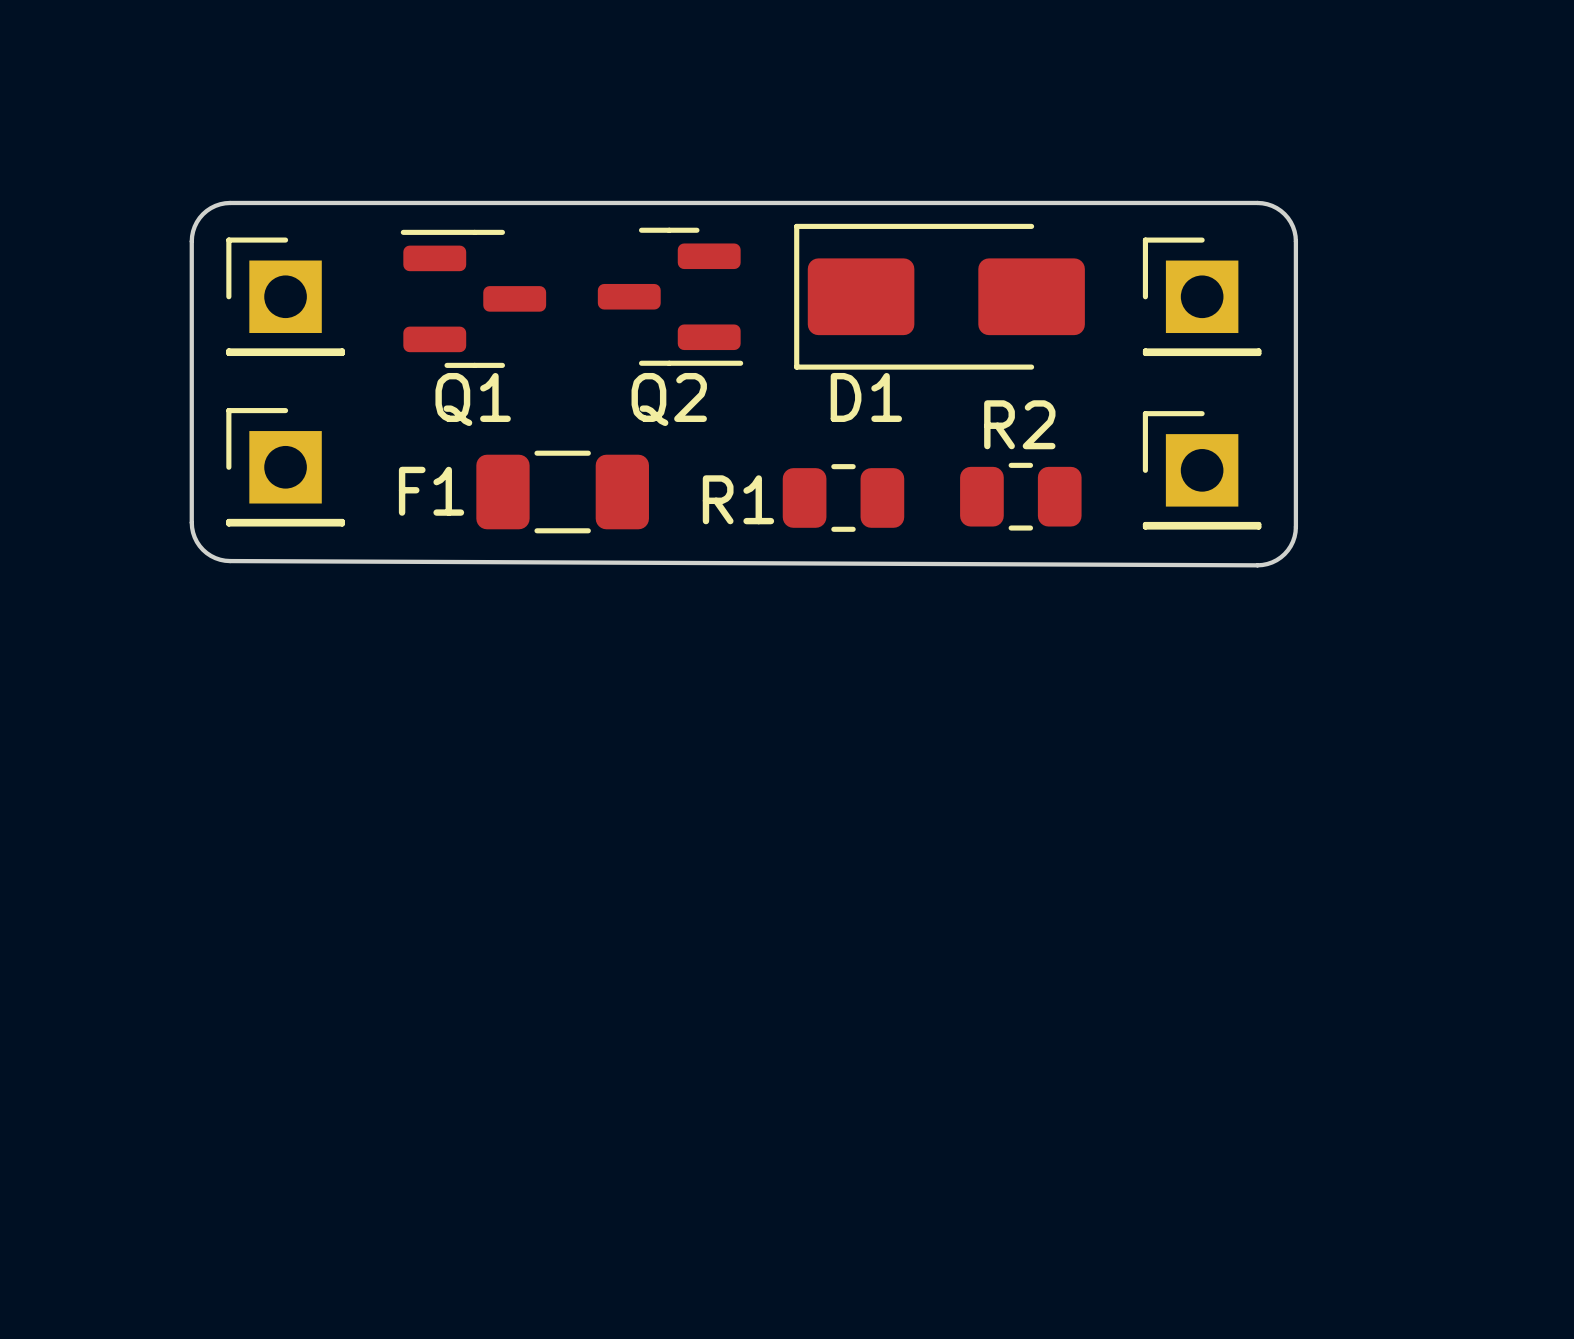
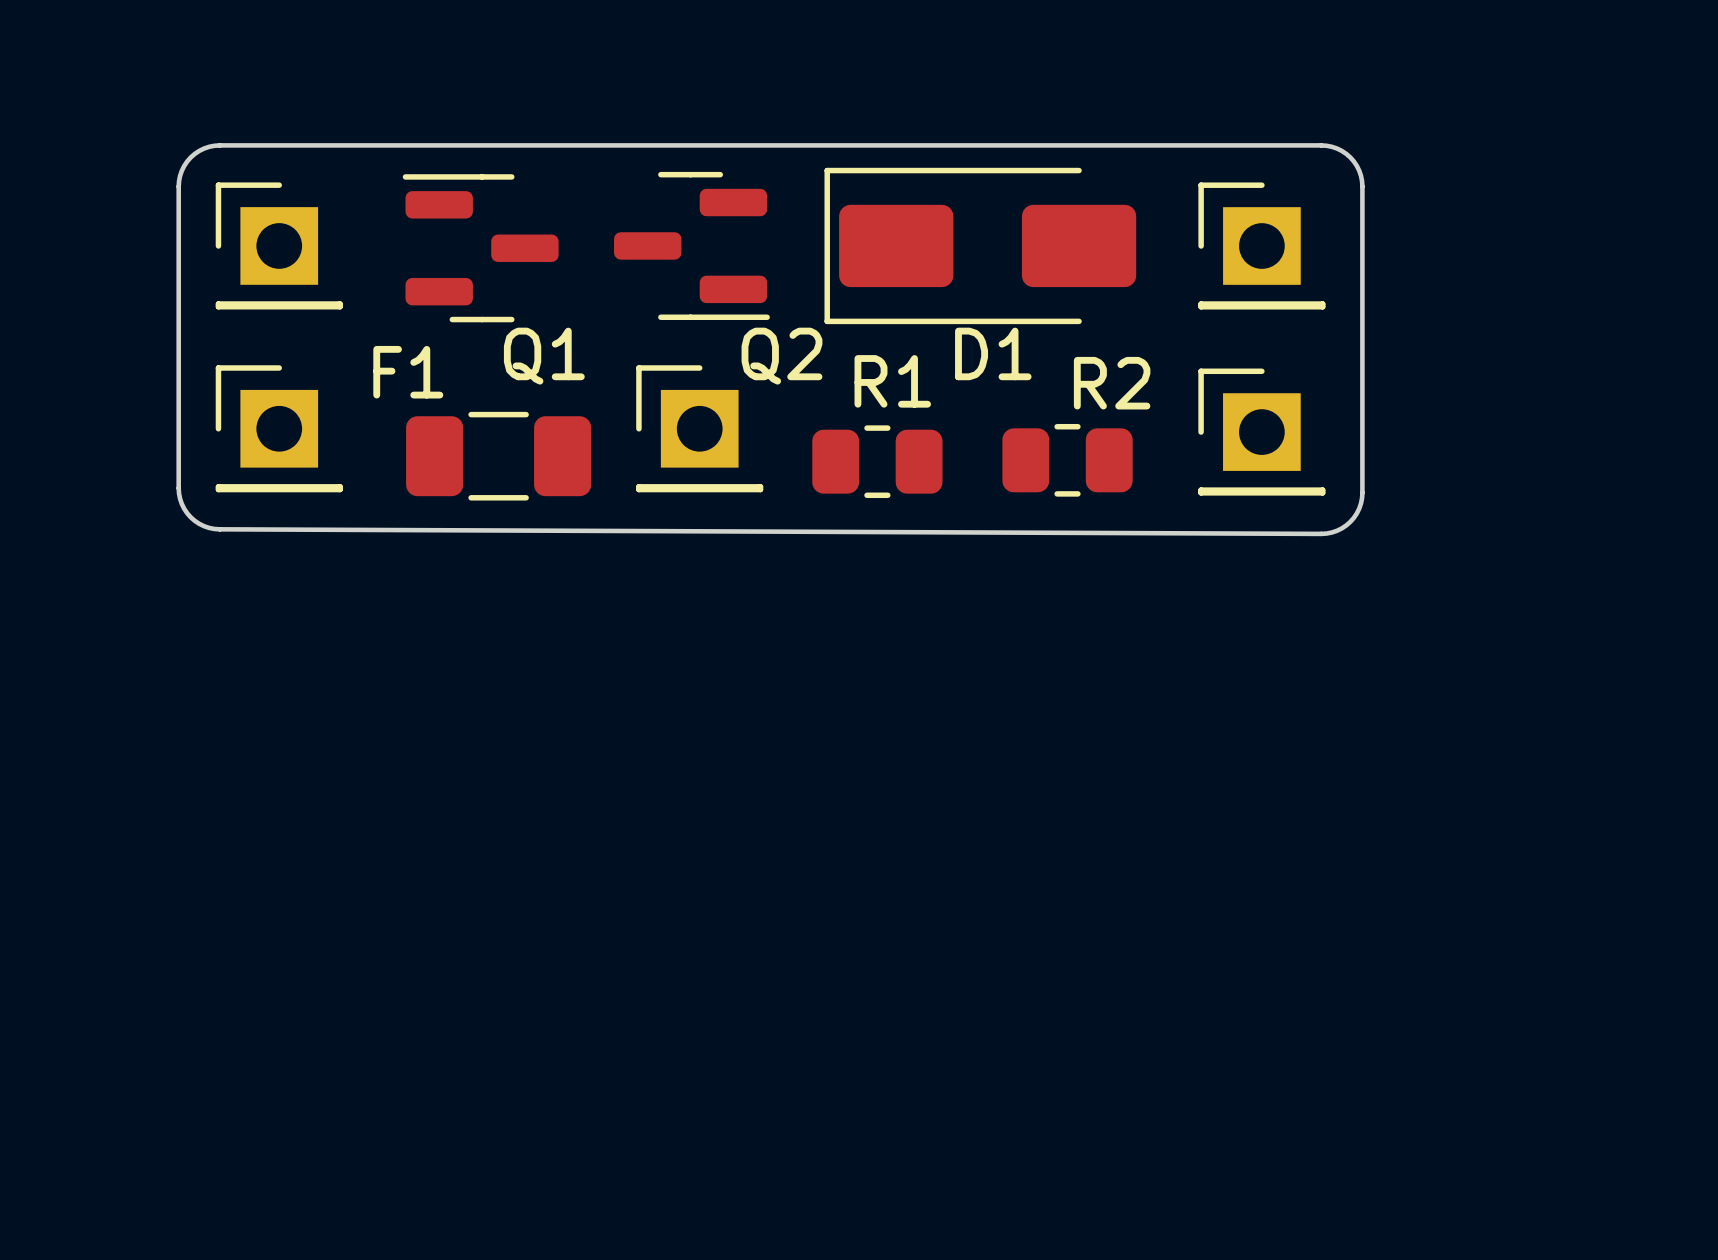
D1 name position: D1 (866, 397) -> D1 (993, 353)
Q1 name position: Q1 (473, 399) -> Q1 (544, 356)
Q2 name position: Q2 (669, 399) -> Q2 (781, 356)
R2 name position: R2 (1019, 424) -> R2 (1112, 383)
part: none -> (699, 428)
F1 name position: F1 (431, 491) -> F1 (408, 372)
F1 position: (562, 492) -> (498, 456)
R1 name position: R1 (738, 499) -> R1 (892, 381)

